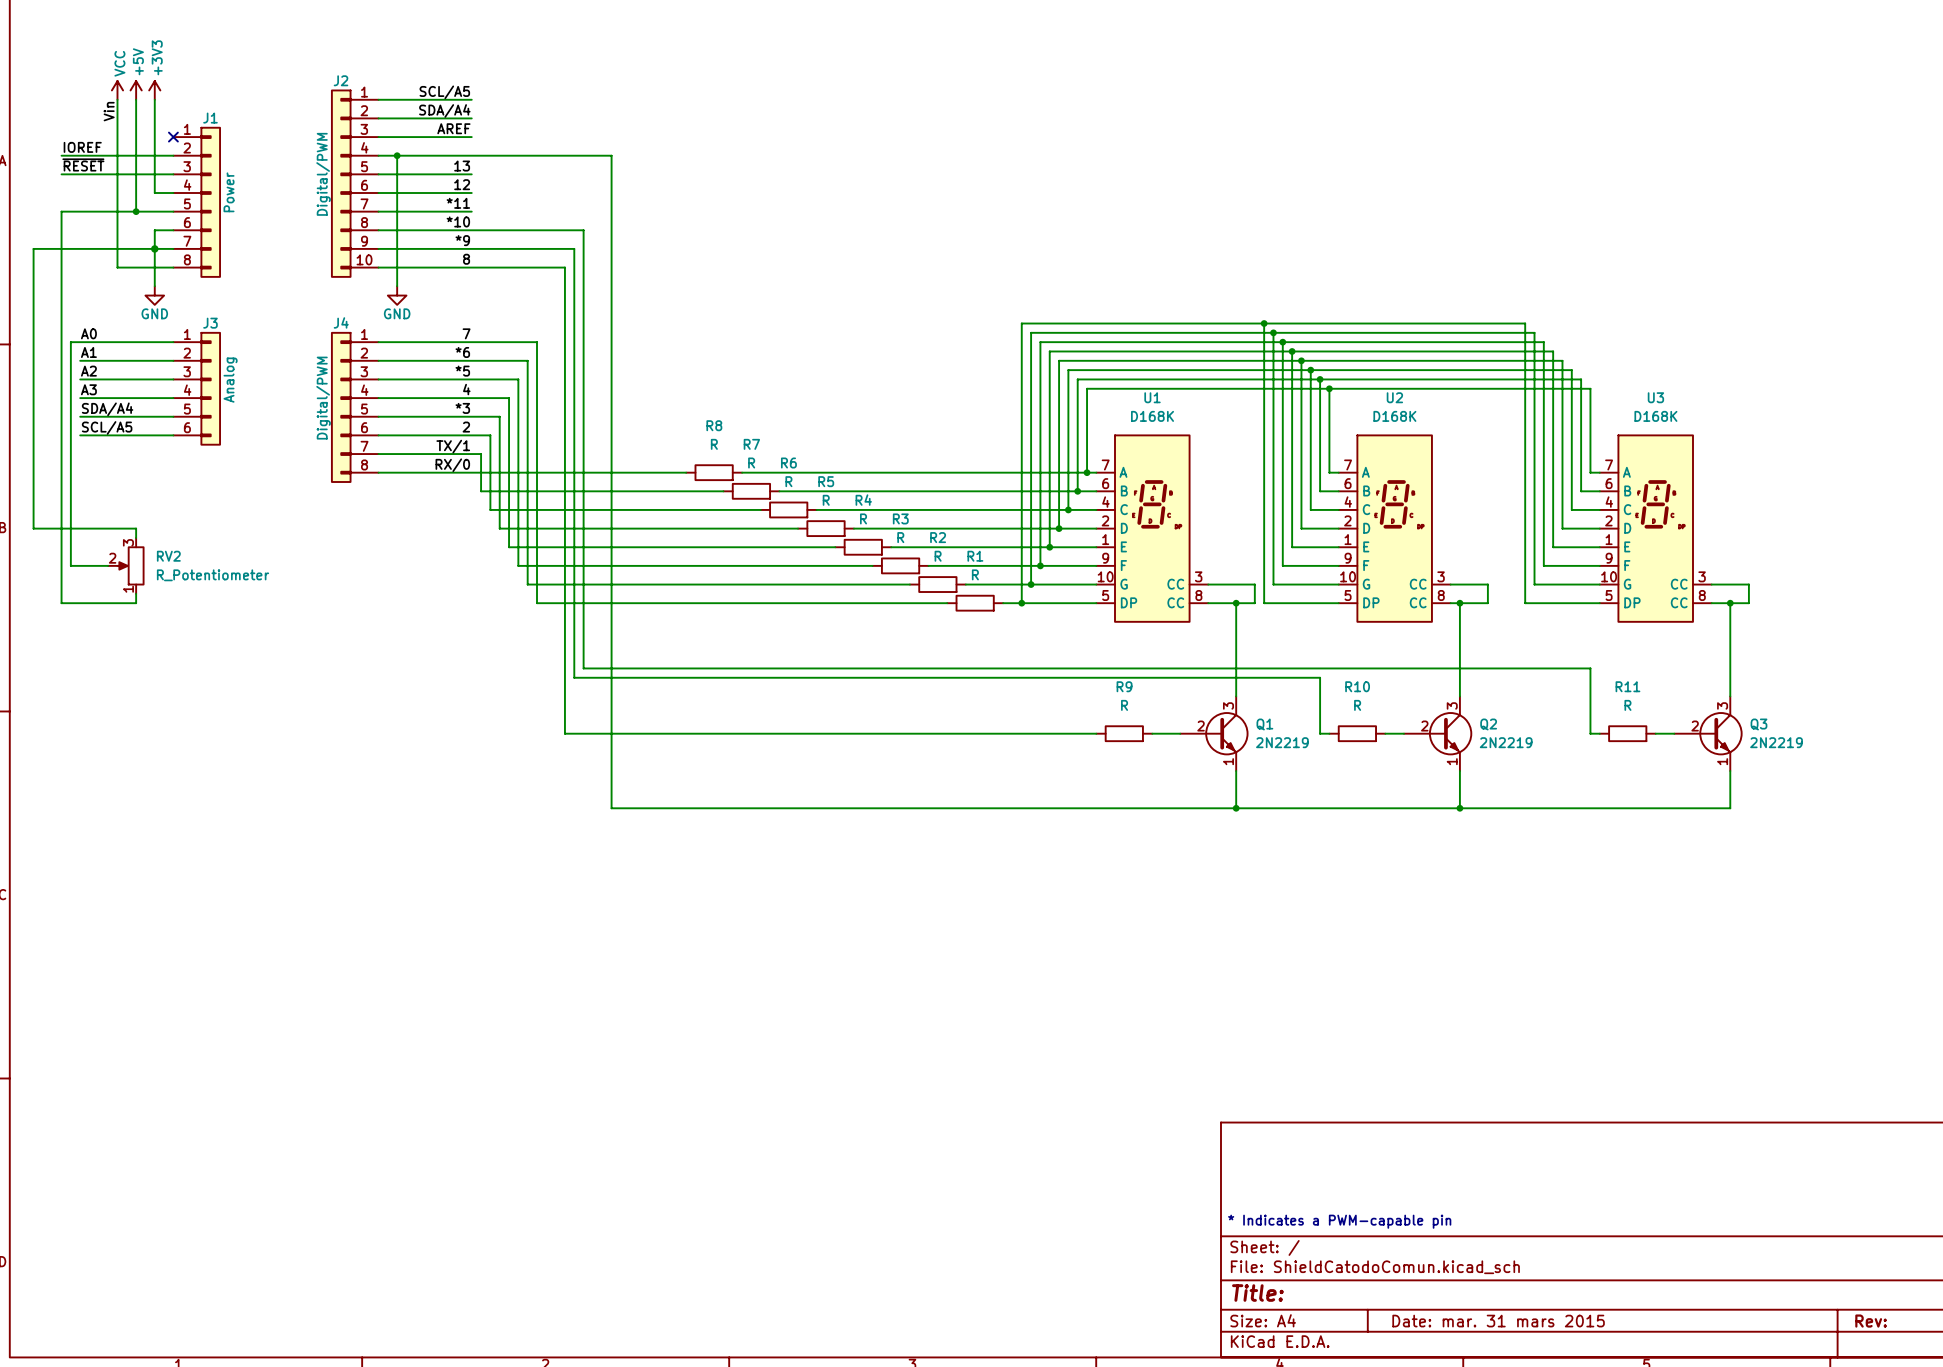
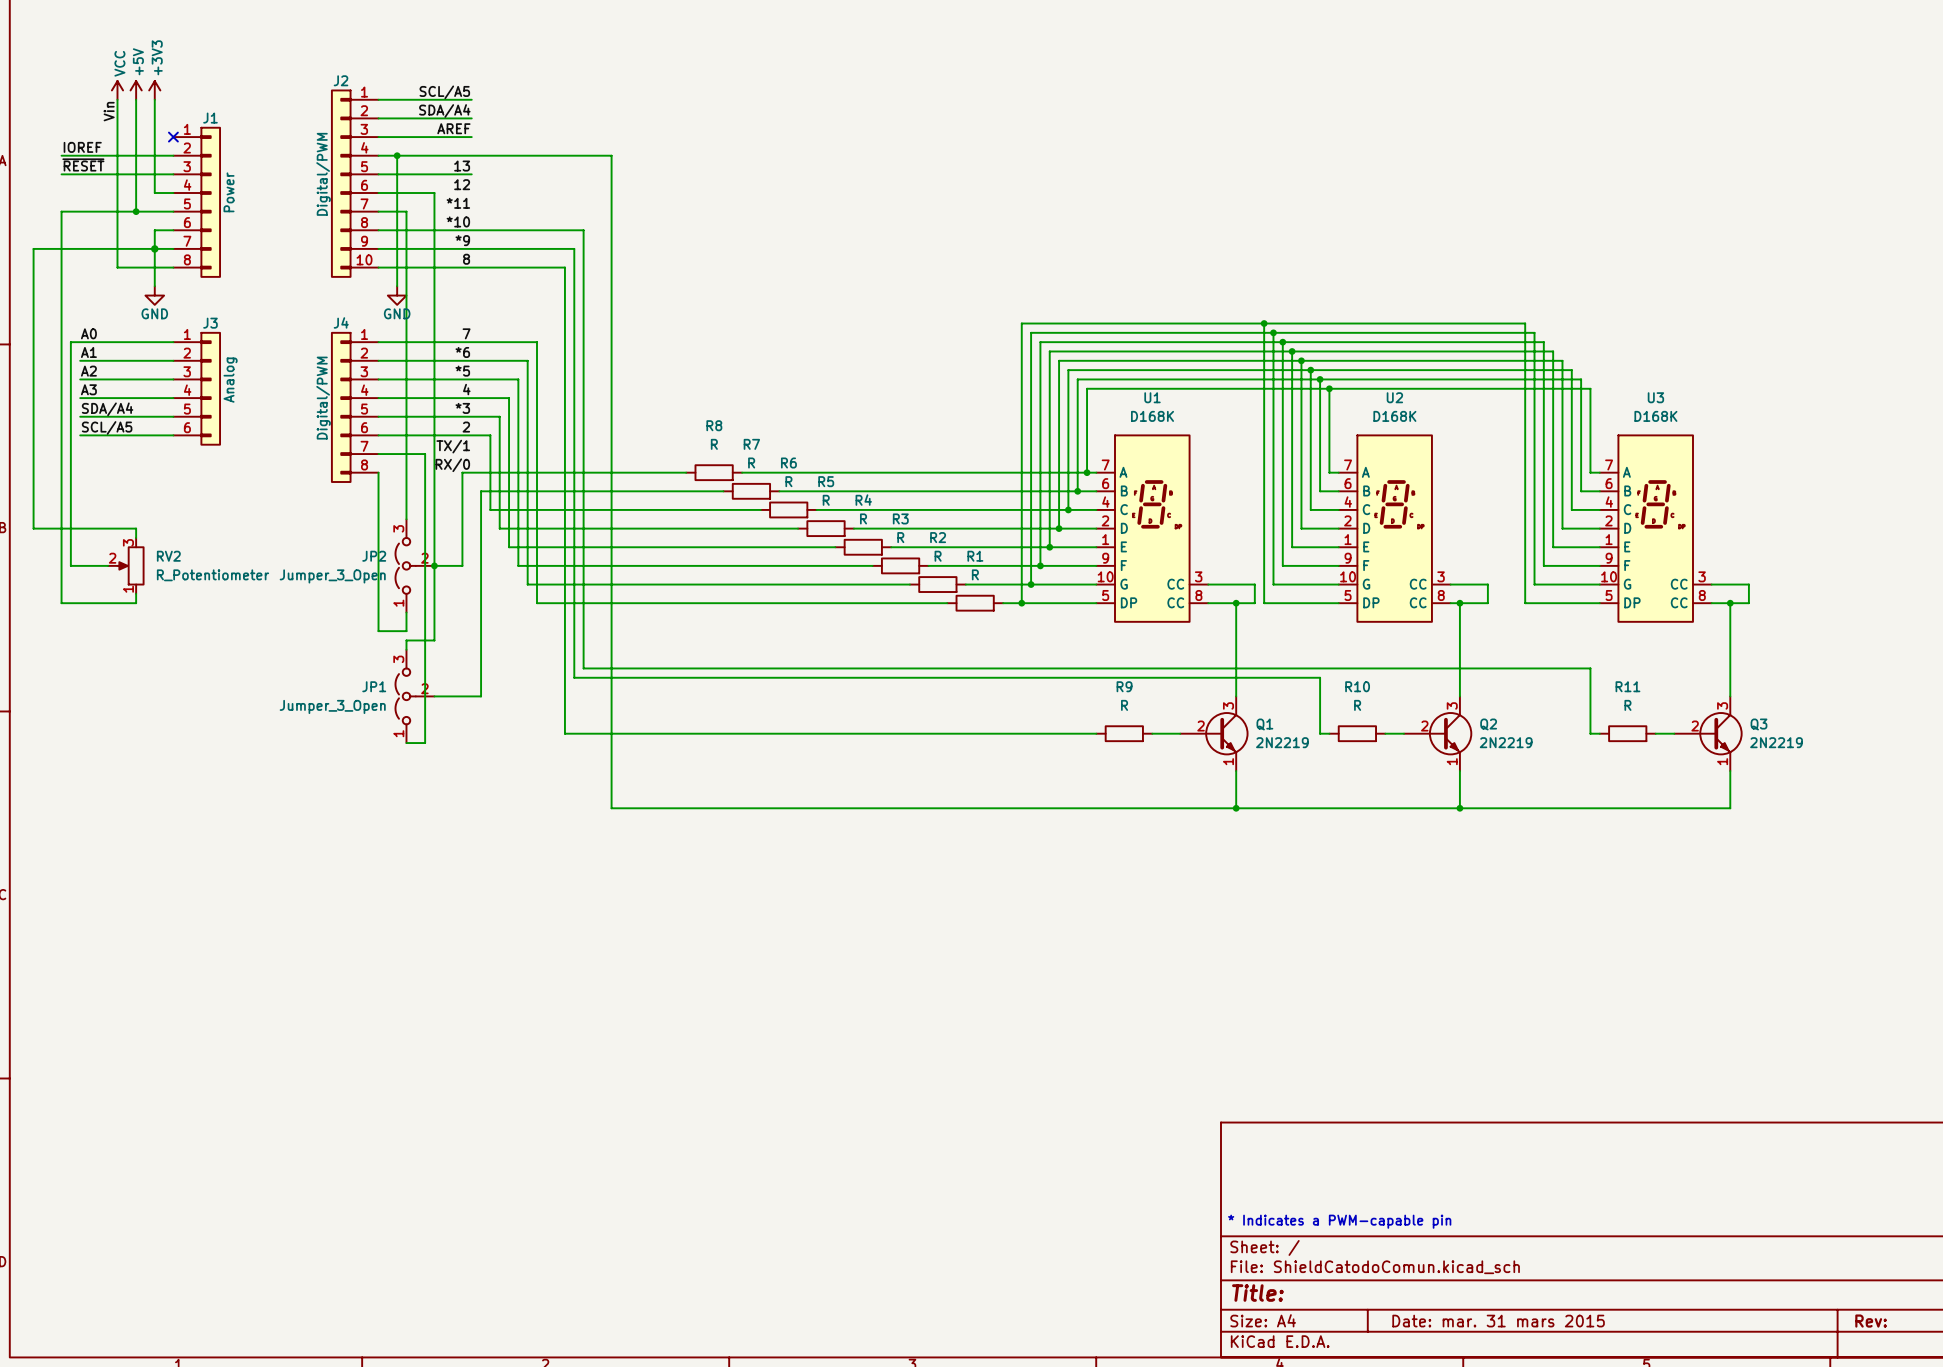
wire: (434, 193) (471, 193) -> (434, 193) (434, 640) (406, 640) (406, 649)
wire: (406, 211) (471, 211) -> (406, 211) (406, 519)
wire: (425, 454) (481, 454) (481, 491) -> (434, 696) (481, 696) (481, 491)
wire: none -> (425, 454) (425, 743) (406, 743)
wire: (378, 472) (462, 472) -> (434, 565) (462, 565) (462, 472)
wire: none -> (378, 472) (378, 631) (406, 631) (406, 612)
JP2: none -> Jumper_3_Open (414, 565)
junction: none -> (434, 565)
JP1: none -> Jumper_3_Open (414, 696)

